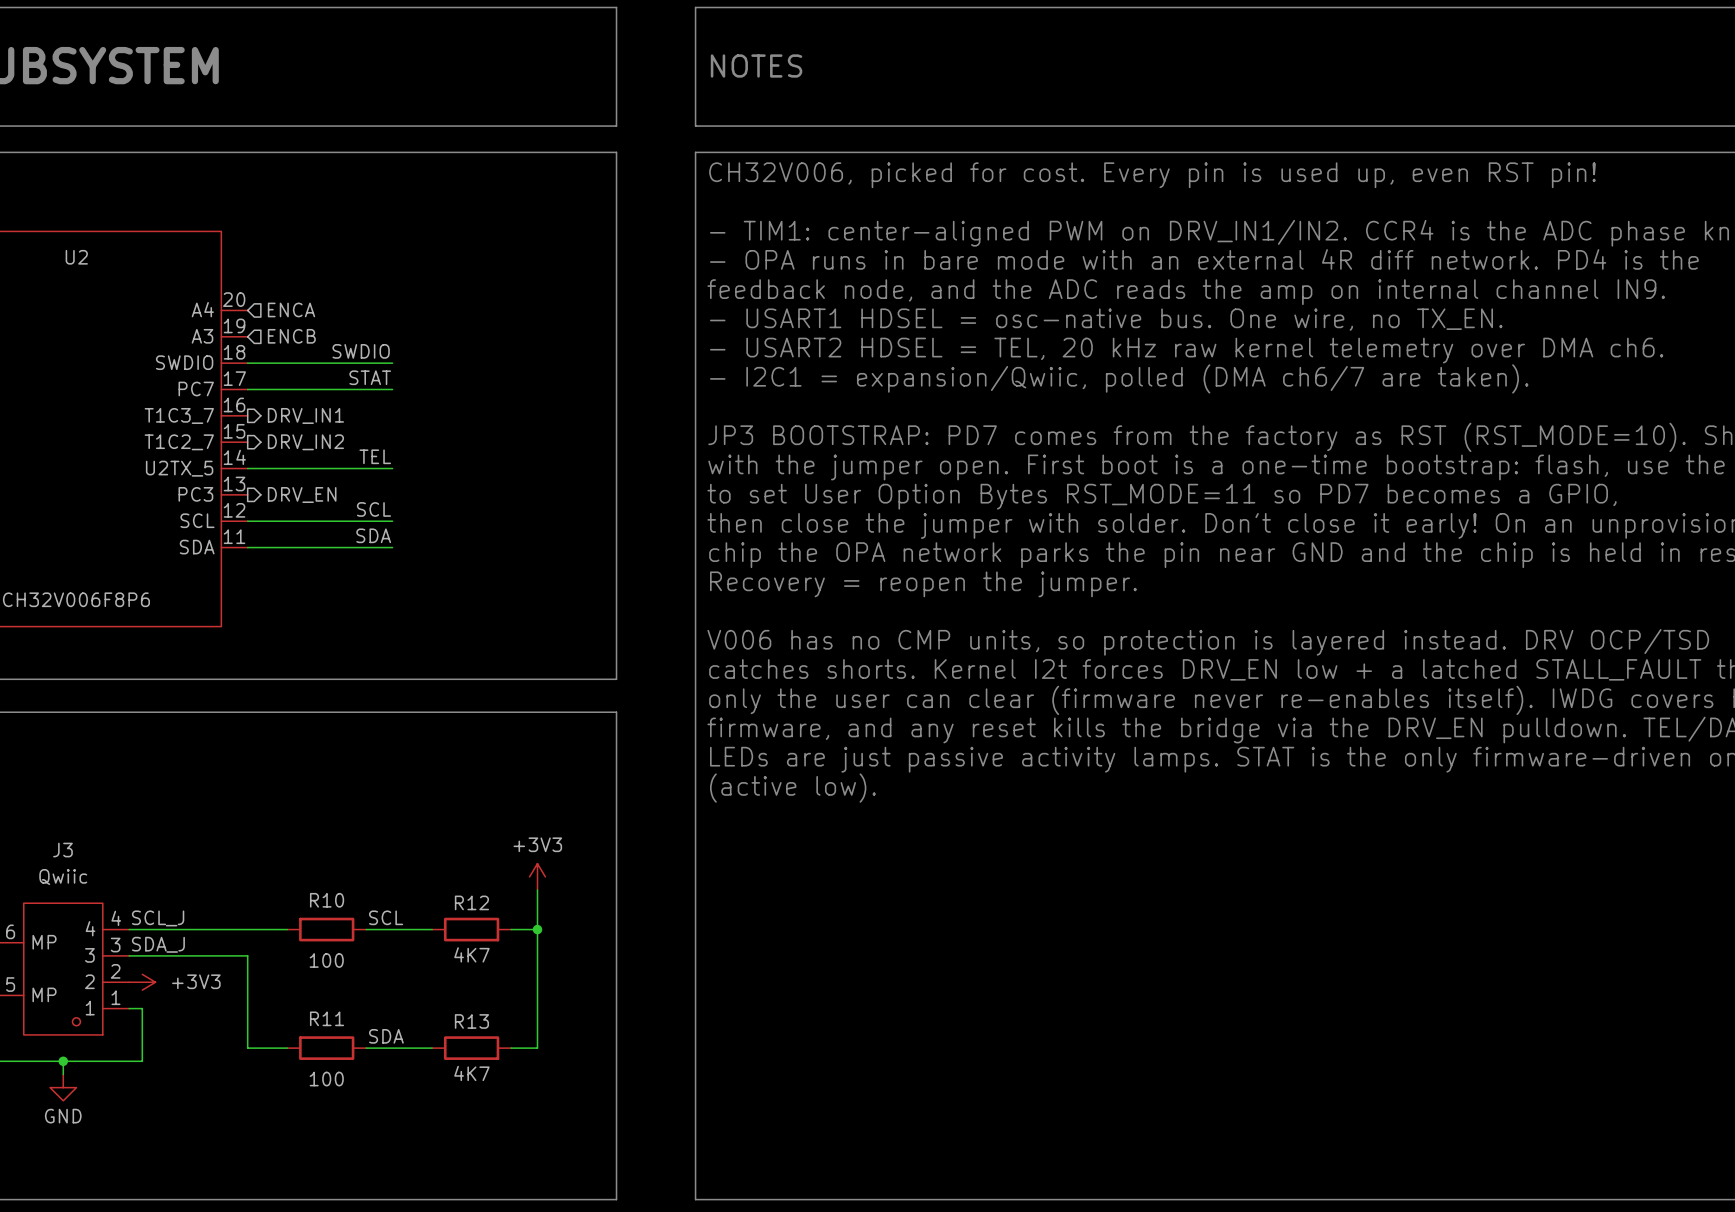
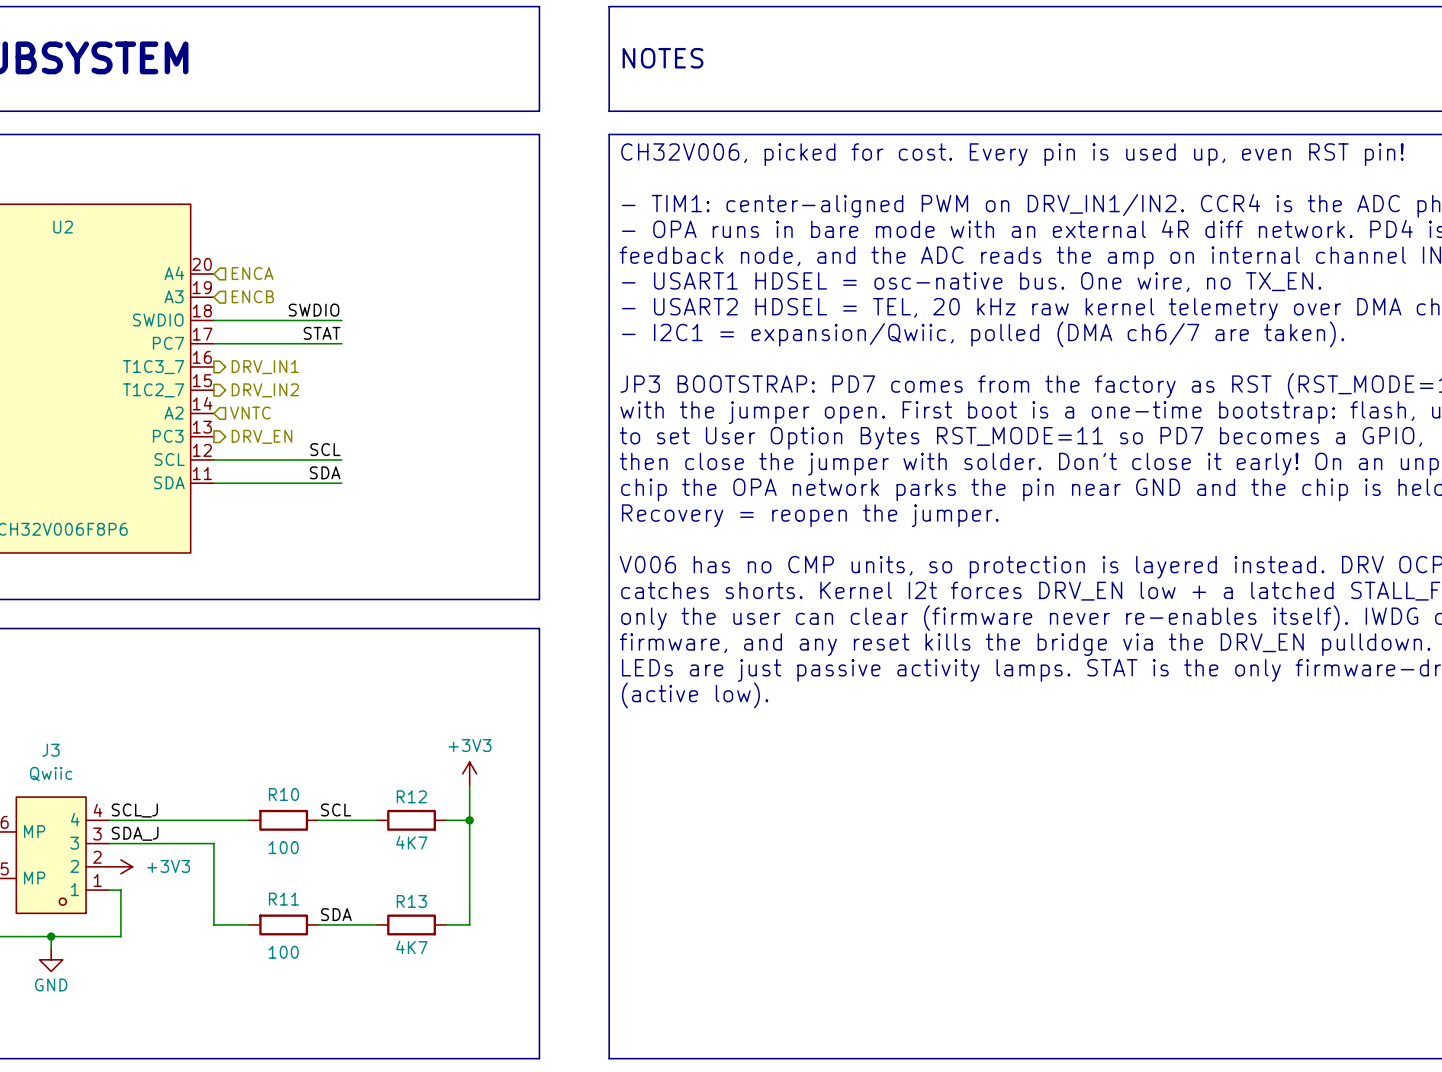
label: TEL (375, 456) -> none
U2 pin name: U2TX_5 (179, 468) -> A2 (174, 413)
wire: (247, 468) (392, 468) -> none
hierarchical label: none -> VNTC (250, 413)

